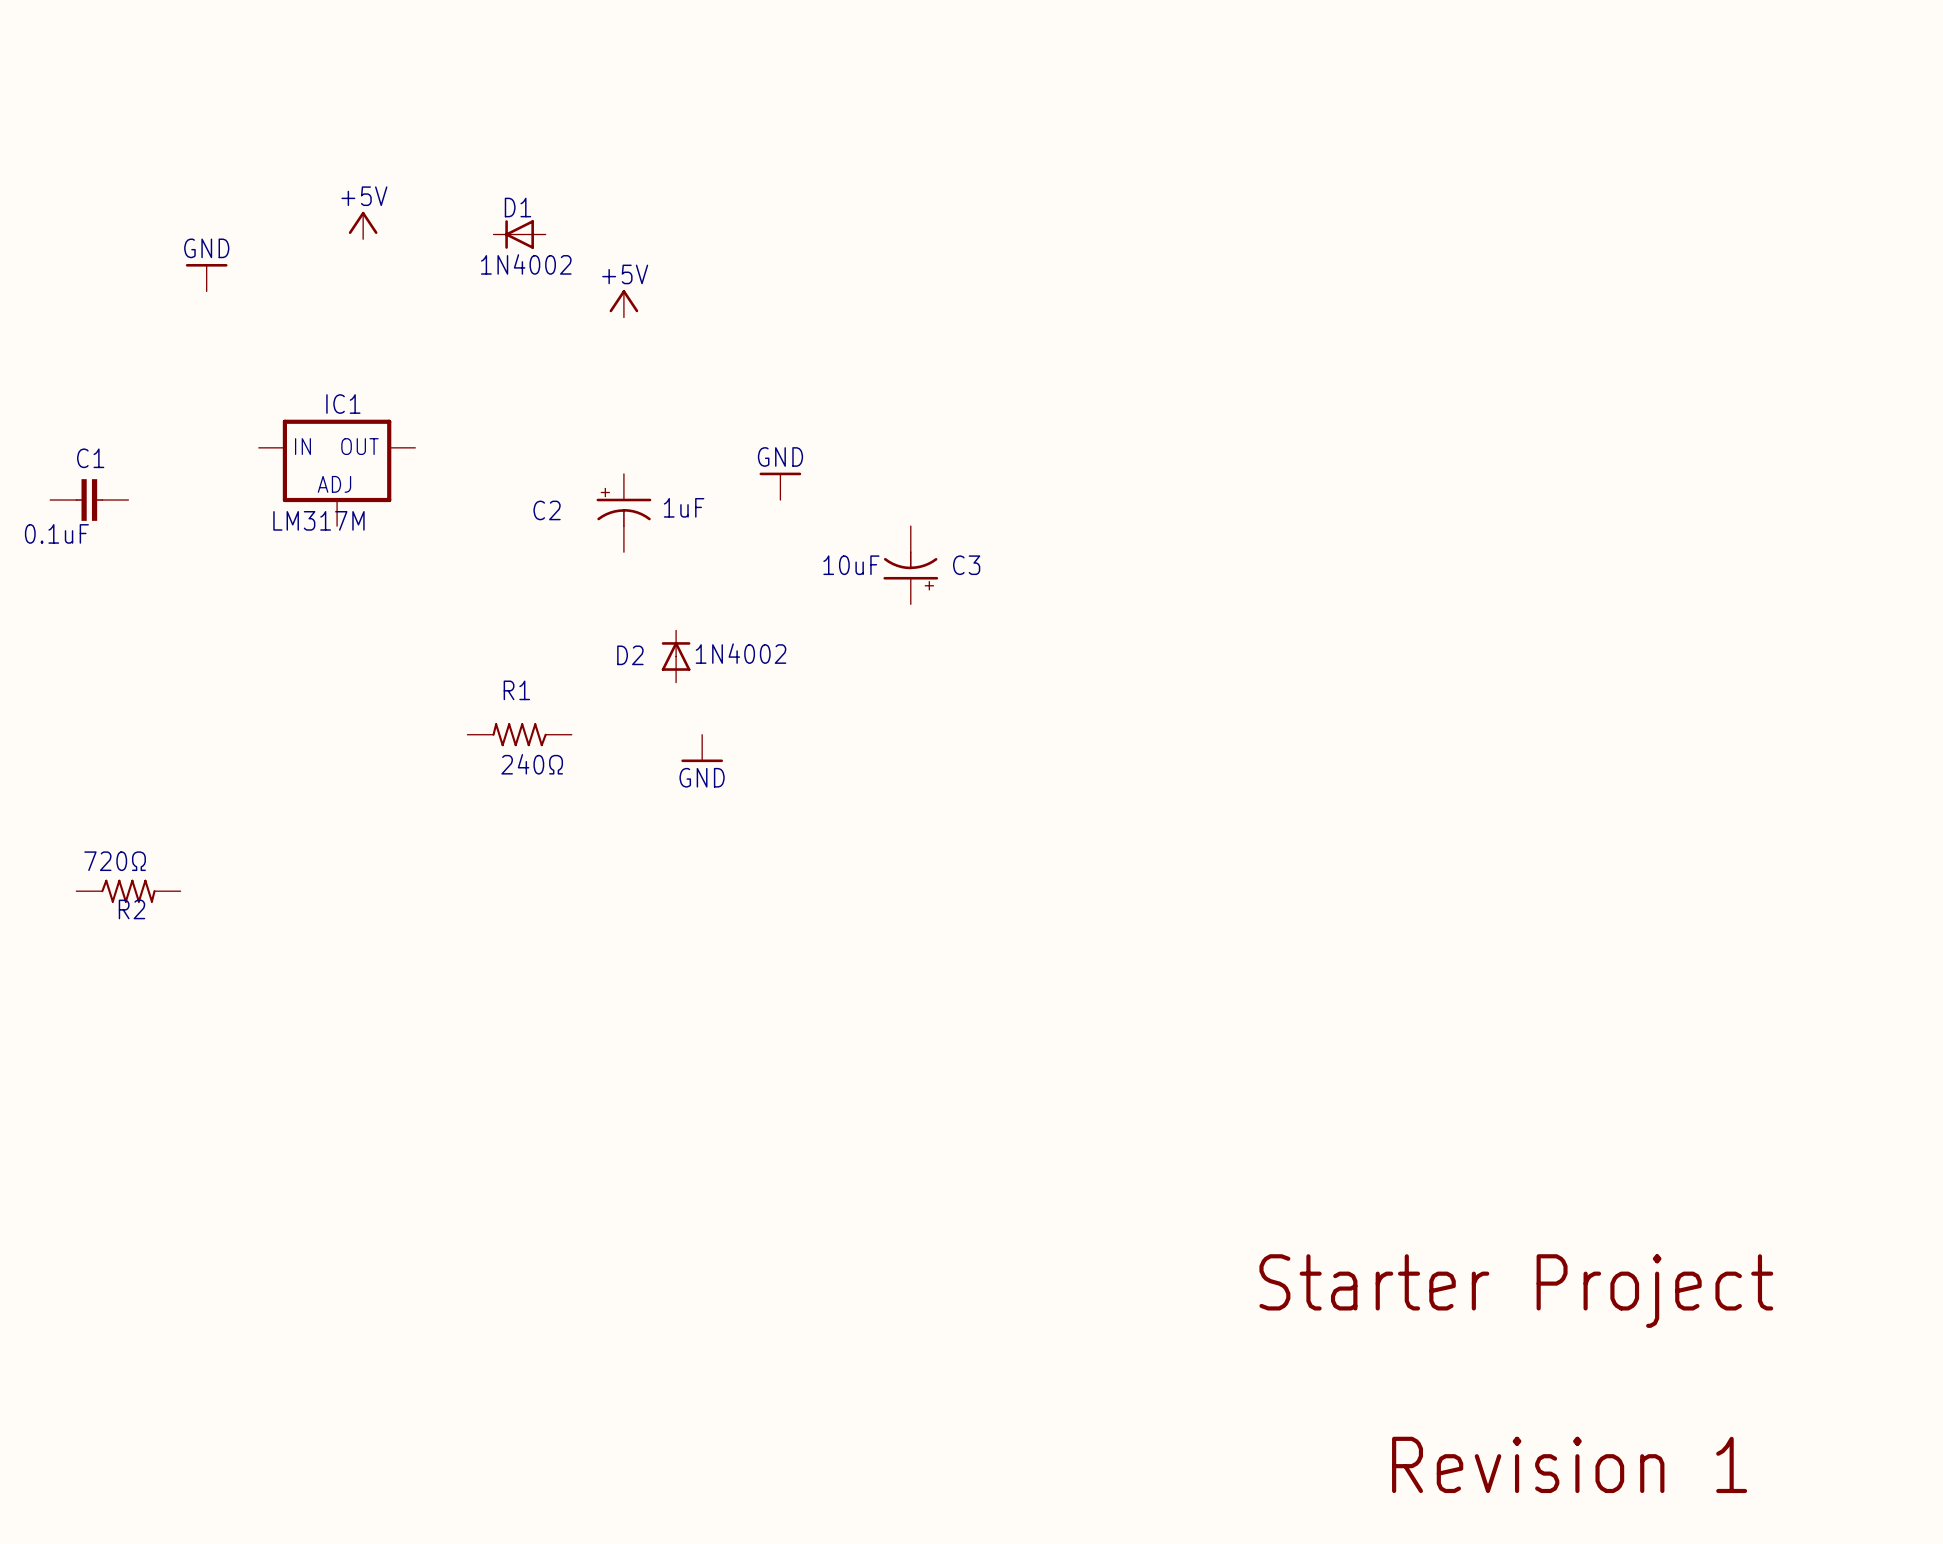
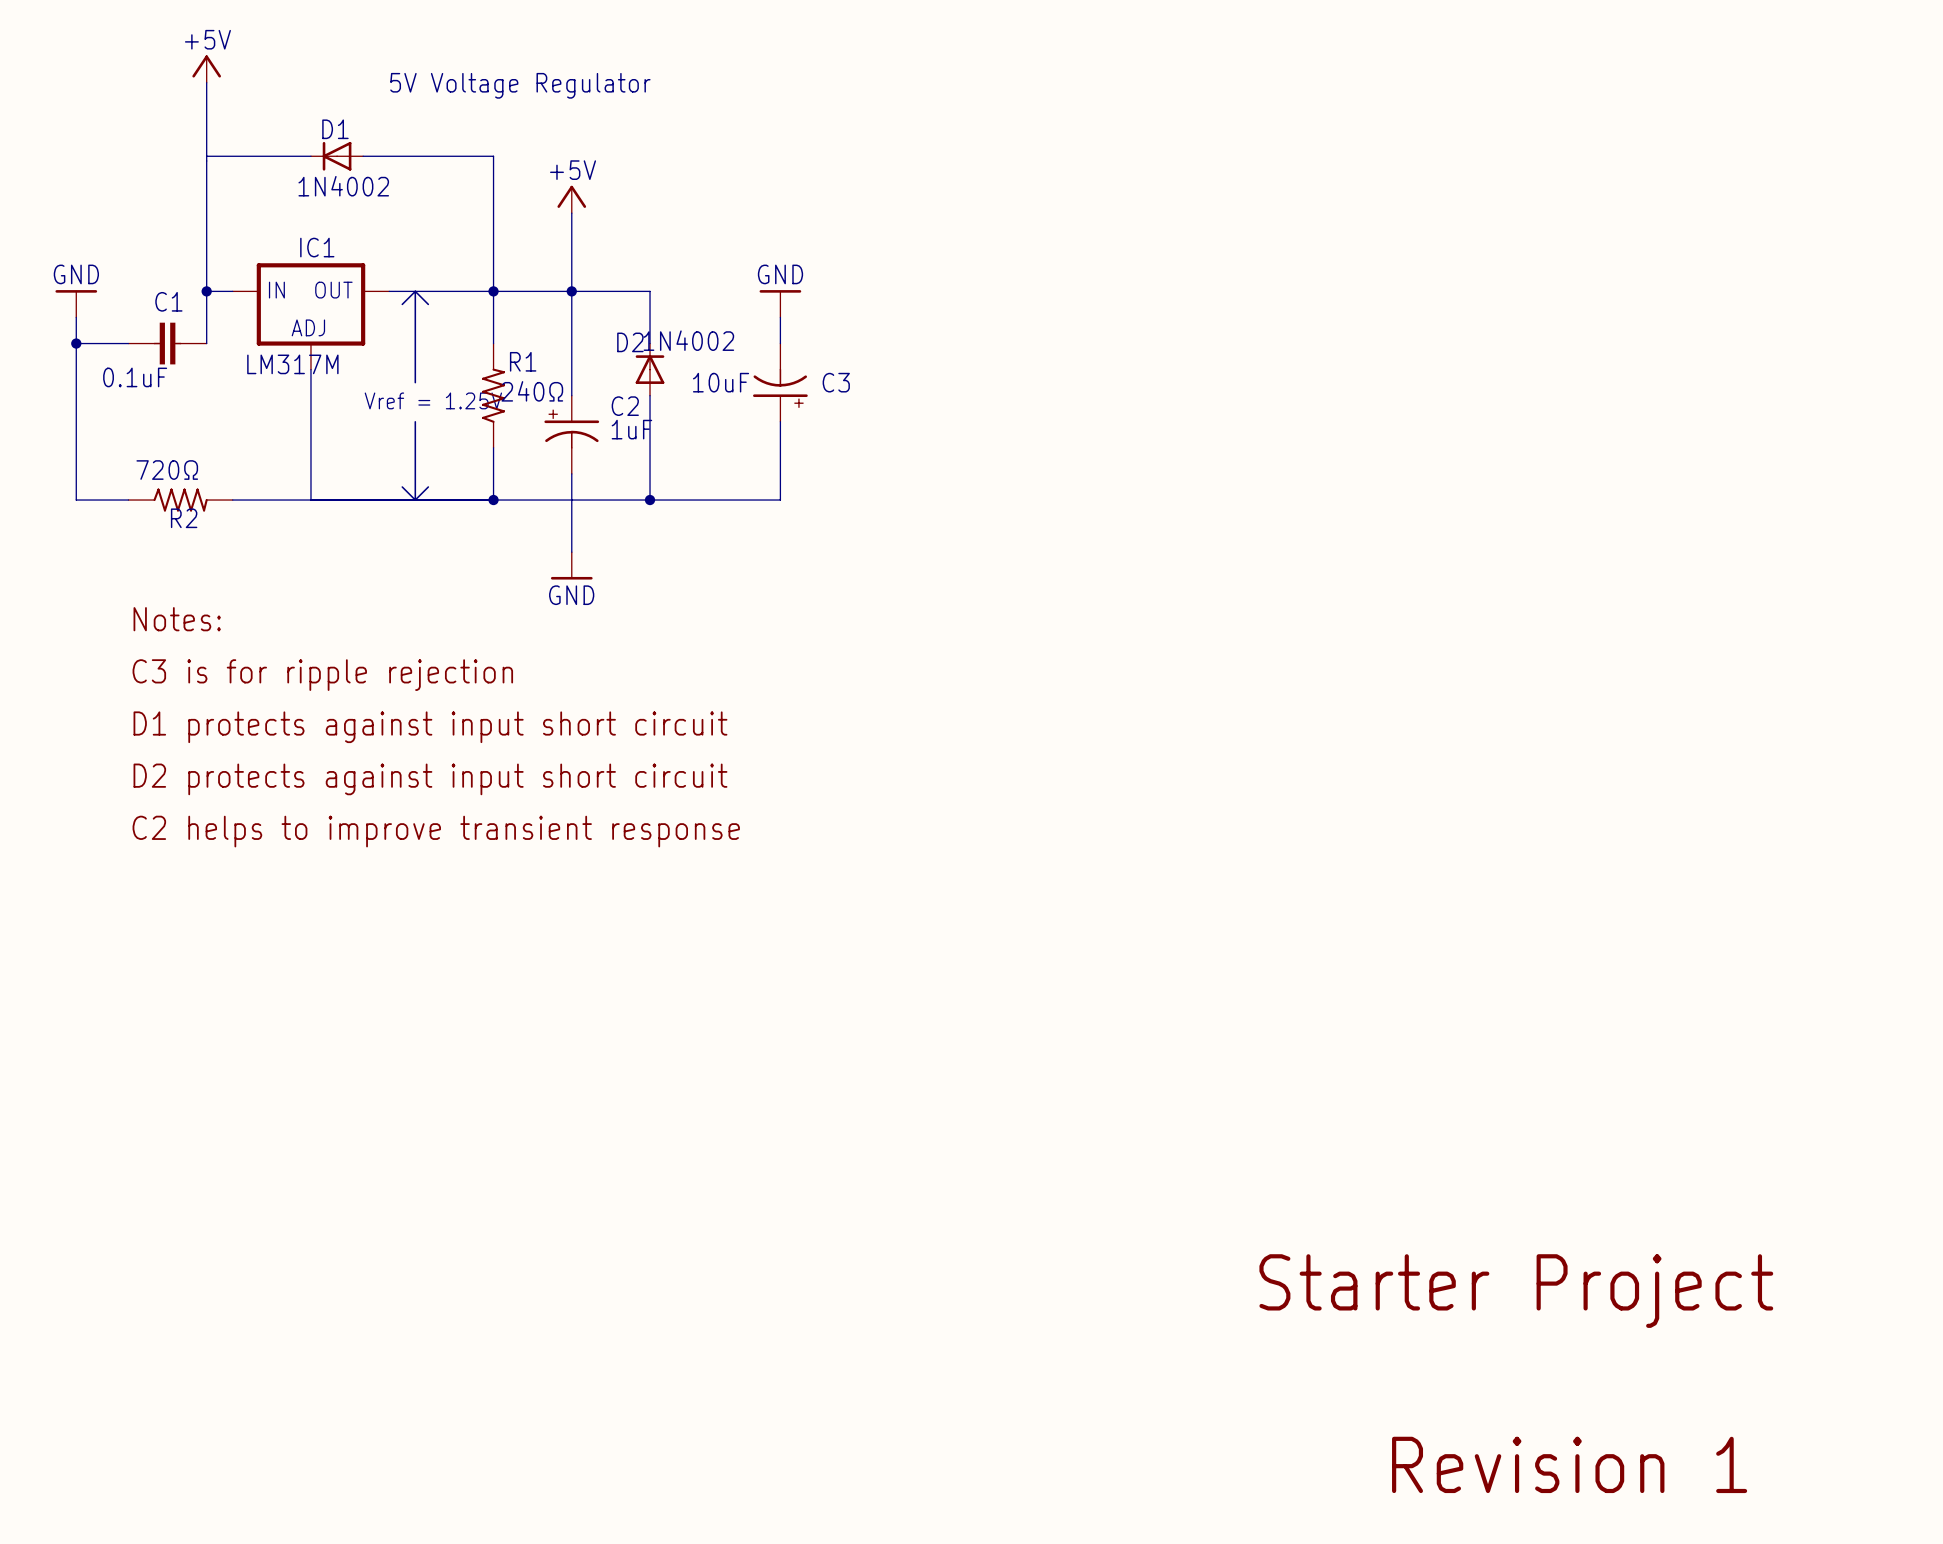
power symbol: none -> +5V (206, 69)
wire: none -> (206, 82) (206, 343)
text: none -> 5V Voltage Regulator (520, 85)
wire: none -> (206, 156) (310, 156)
wire: none -> (363, 156) (493, 156) (493, 343)
power symbol: none -> +5V (571, 199)
wire: none -> (571, 213) (571, 395)
power symbol: +5V (363, 225) -> none
D1 position: (519, 234) -> (337, 156)
power symbol position: GND (206, 277) -> GND (76, 303)
wire: none -> (206, 291) (232, 291)
junction: none -> (206, 291)
wire: none -> (389, 291) (650, 291) (650, 343)
line: none -> (415, 291) (415, 382)
line: none -> (415, 291) (428, 304)
line: none -> (415, 291) (402, 304)
junction: none -> (493, 291)
junction: none -> (571, 291)
power symbol: +5V (623, 303) -> none
power symbol: none -> GND (780, 303)
wire: none -> (76, 317) (76, 500) (128, 500)
wire: none -> (780, 317) (780, 343)
wire: none -> (76, 343) (128, 343)
junction: none -> (76, 343)
wire: none -> (310, 369) (310, 500)
wire: none -> (650, 395) (650, 500)
text: none -> Vref = 1.25V (433, 400)
line: none -> (415, 421) (415, 500)
wire: none -> (780, 421) (780, 500) (232, 500)
wire: none -> (493, 447) (493, 500)
IC1 position: (337, 472) -> (310, 316)
wire: none -> (571, 473) (571, 552)
line: none -> (402, 486) (415, 500)
line: none -> (428, 486) (415, 500)
power symbol: GND (780, 486) -> none
C1 position: (89, 500) -> (167, 343)
junction: none -> (493, 500)
junction: none -> (650, 500)
C2 name position: C2 (547, 510) -> C2 (625, 406)
C2 position: (623, 513) -> (571, 434)
power symbol: none -> GND (571, 565)
C3 position: (910, 565) -> (780, 382)
text: none -> Notes: (177, 619)
D2 value position: 1N4002 (741, 653) -> 1N4002 (688, 340)
D2 name position: D2 (630, 655) -> D2 (630, 342)
D2 position: (676, 656) -> (650, 369)
text: none -> C3 is for ripple rejection (322, 675)
R1 name position: R1 (516, 690) -> R1 (523, 361)
text: none -> D1 protects against input short circuit (430, 727)
R1 rotation: 0° (519, 734) -> 90° clockwise (493, 395)
R1 position: (519, 734) -> (493, 395)
power symbol: GND (702, 748) -> none
R1 value position: 240Ω (532, 764) -> 240Ω (532, 391)
text: none -> D2 protects against input short circuit (430, 779)
text: none -> C2 helps to improve transient response (436, 831)
R2 position: (128, 891) -> (180, 500)

